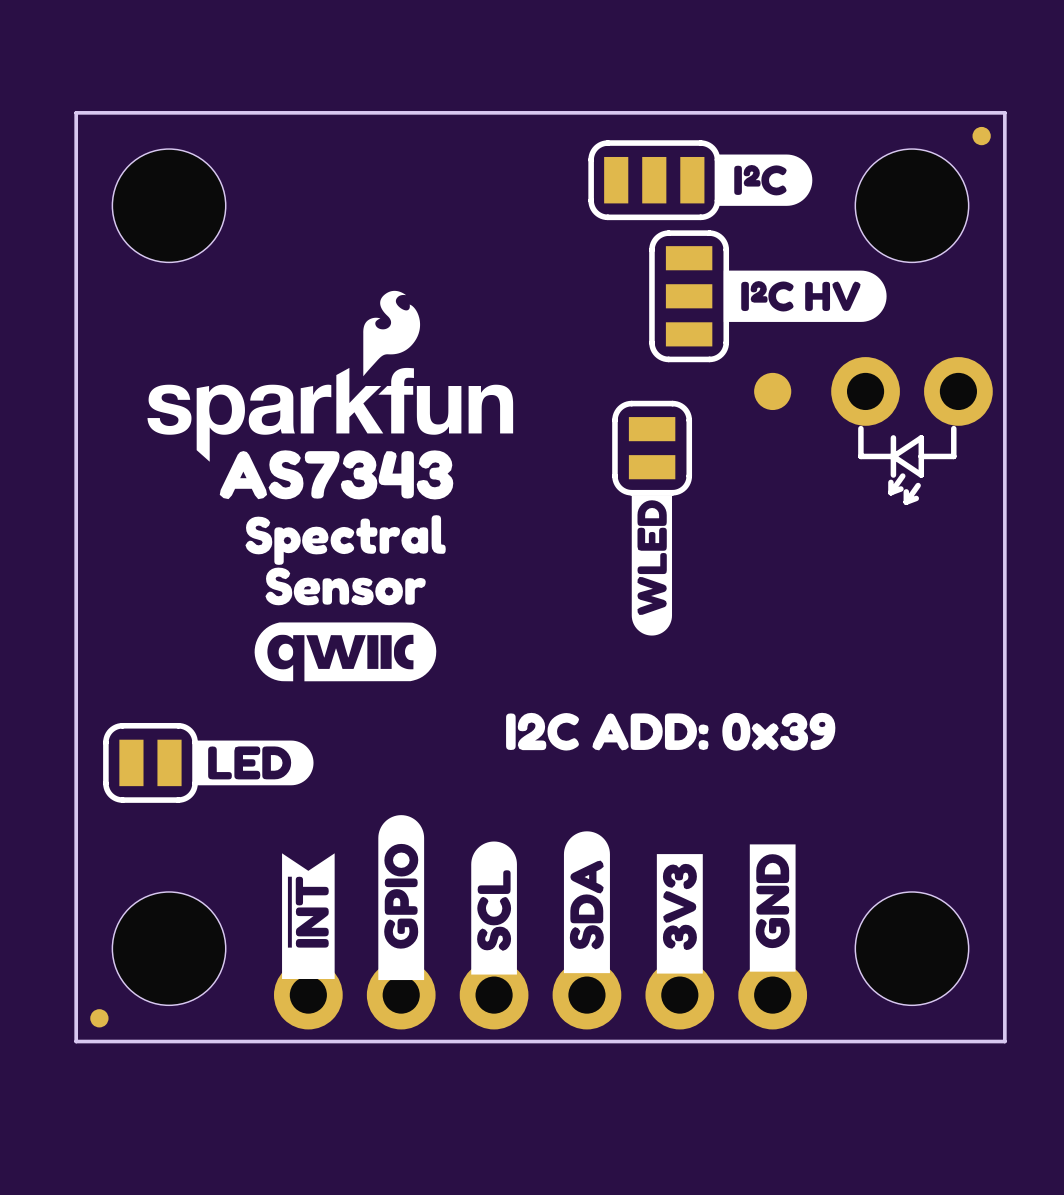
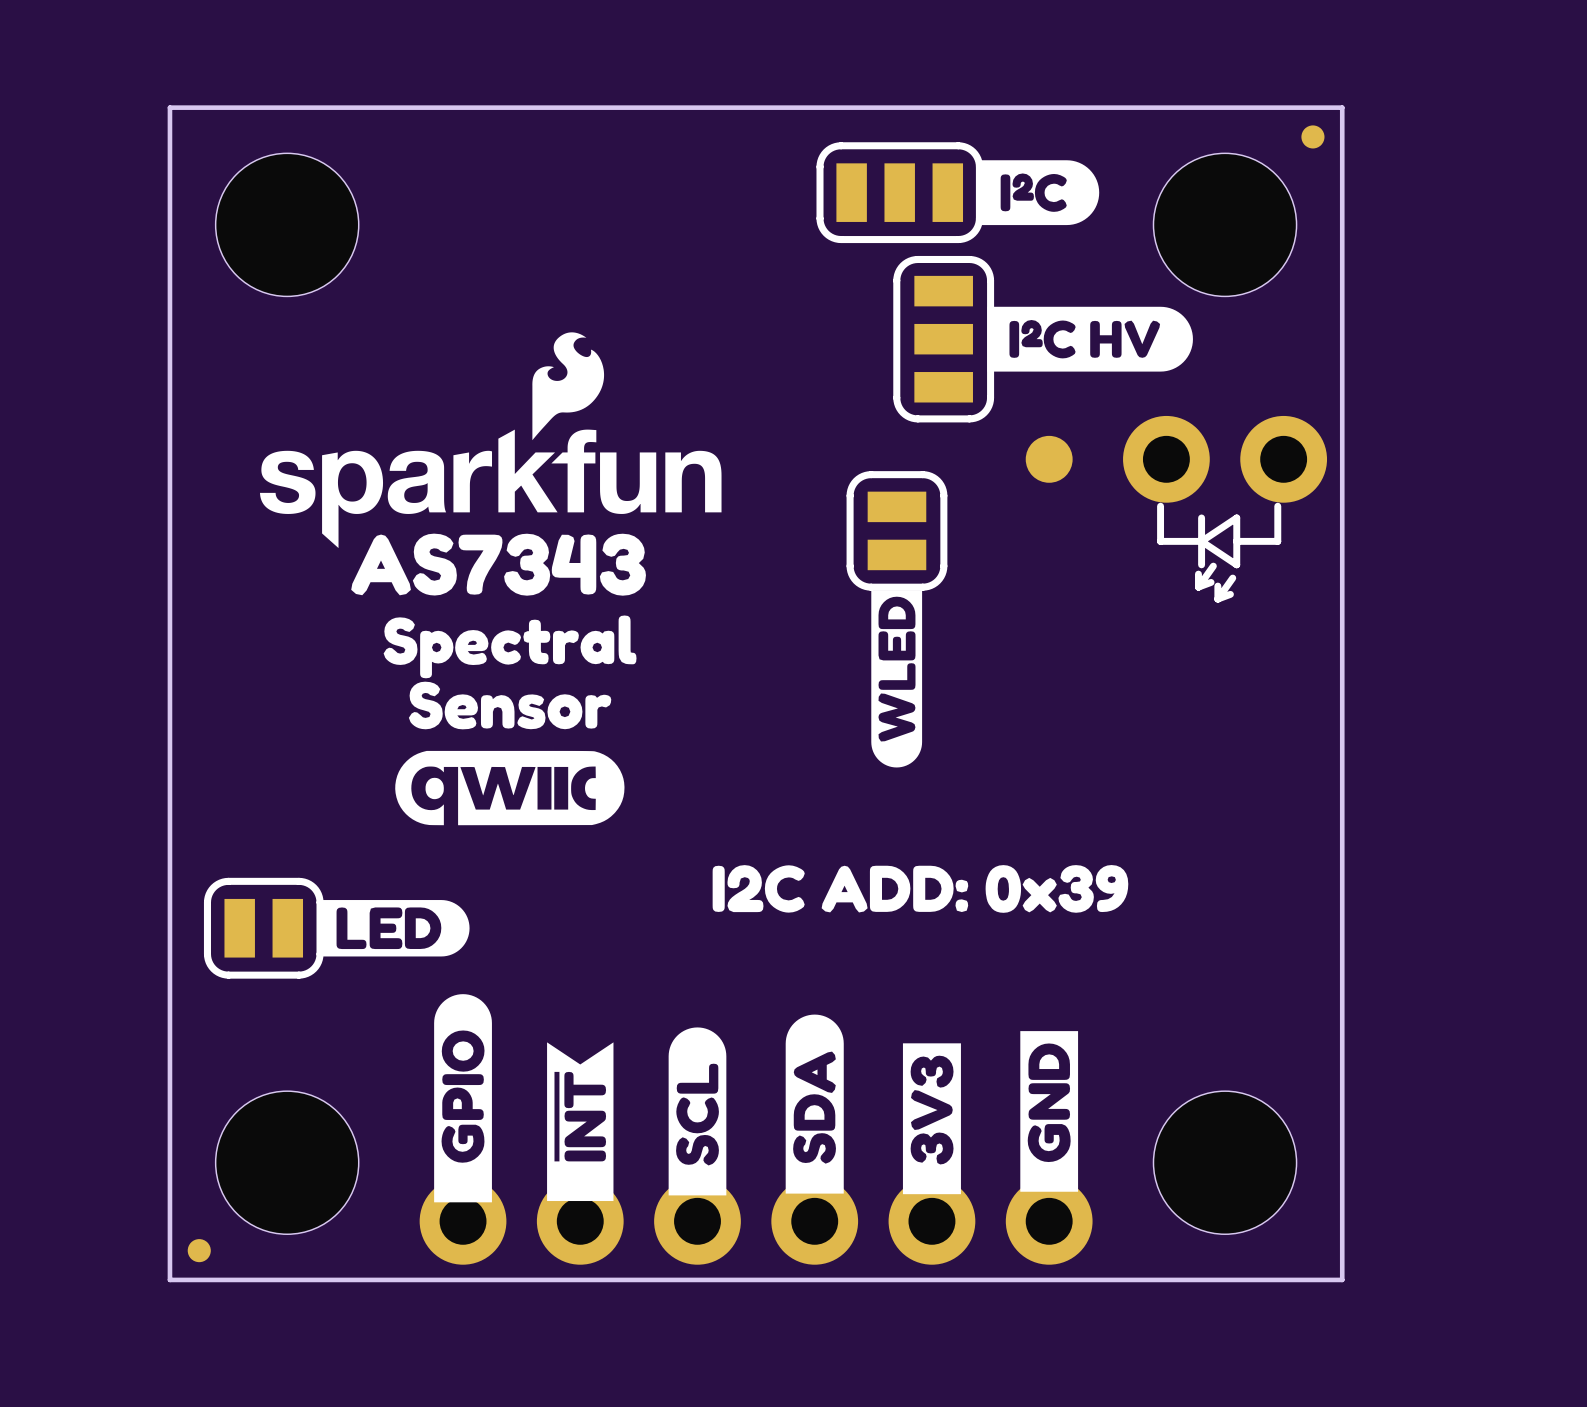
drawing position: (401, 897) -> (463, 1098)
drawing position: (308, 916) -> (580, 1121)

